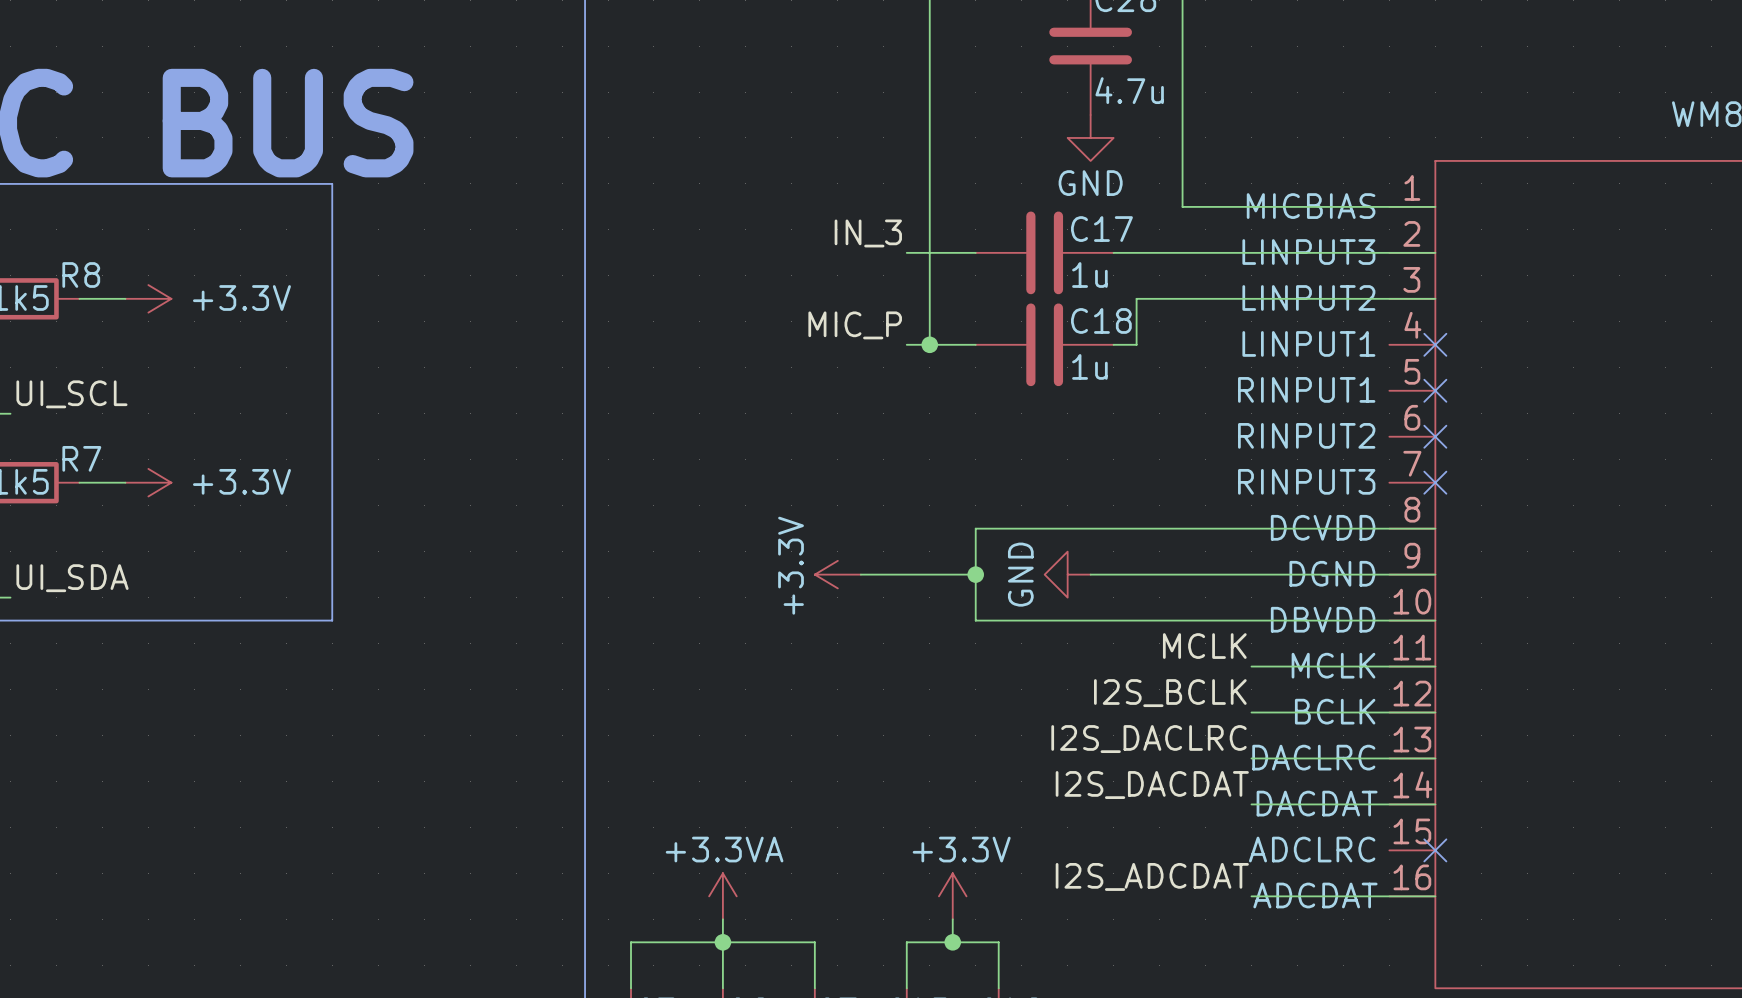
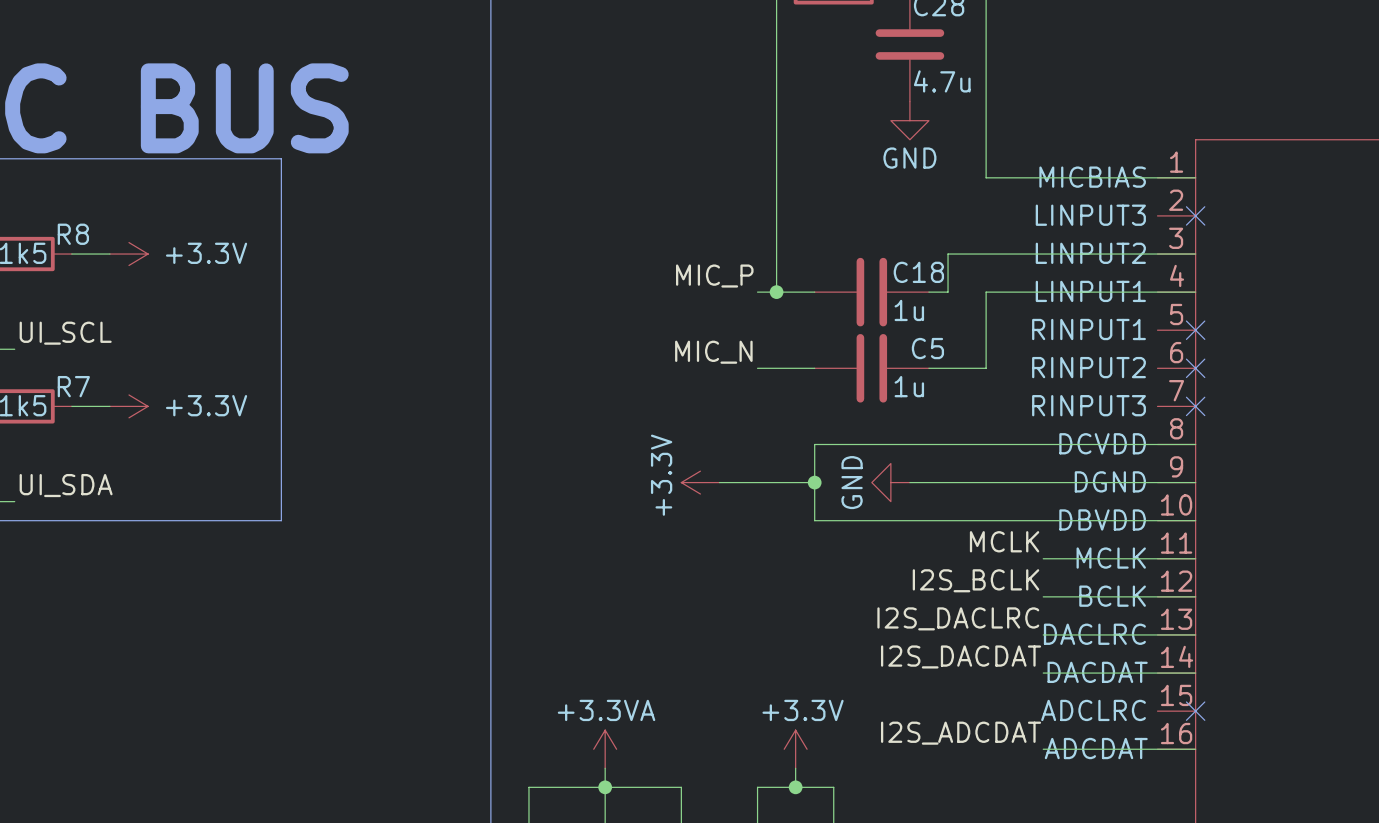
label: IN_3 (868, 233) -> none
wire: (906, 252) (975, 252) -> (757, 368) (814, 368)
C17: 1u (1044, 252) -> none
wire: (1113, 252) (1435, 252) -> none
wire: none -> (1195, 292) (986, 292) (986, 368) (928, 368)
no-connect mark position: (1435, 344) -> (1195, 215)
label: none -> MIC_N (713, 352)
C5: none -> 1u (871, 368)

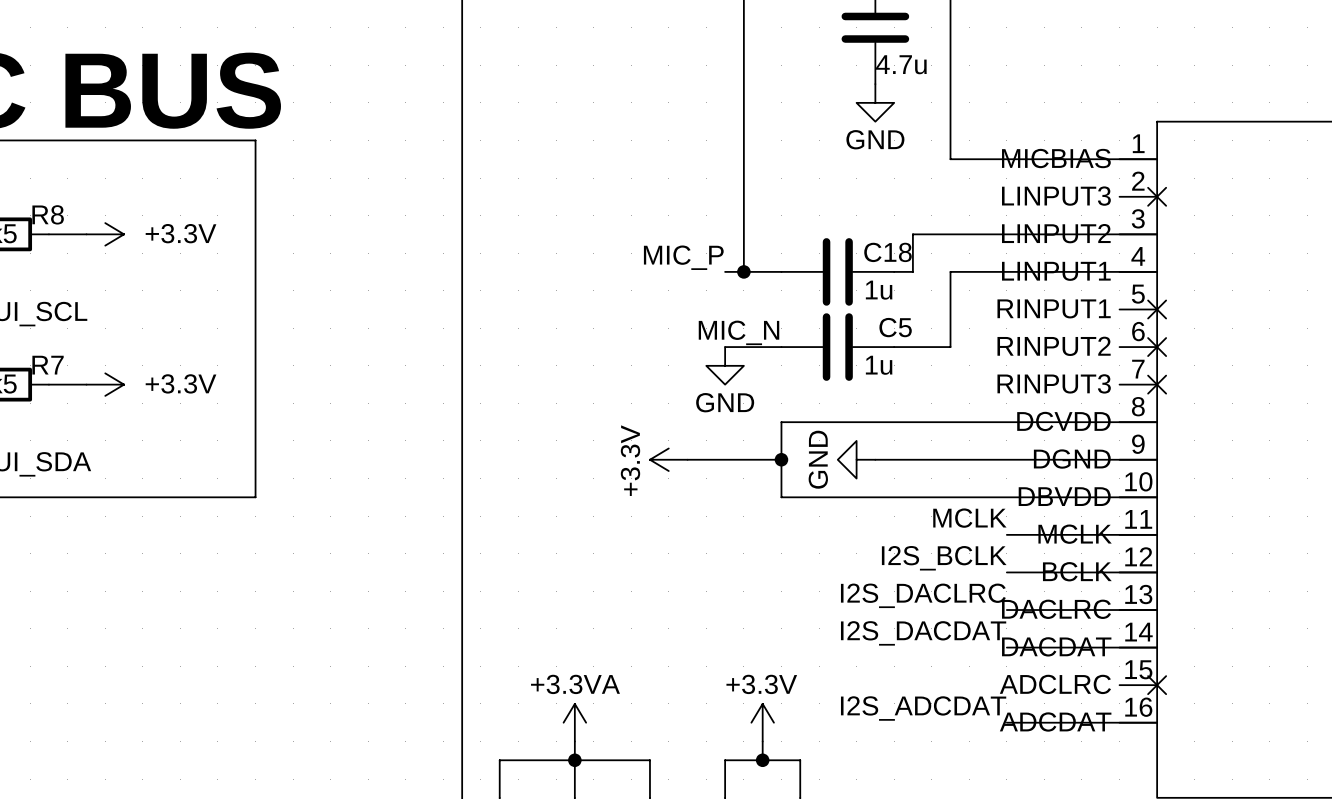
label position: MIC_N (713, 352) -> MIC_N (738, 332)
power symbol: none -> GND (725, 365)

